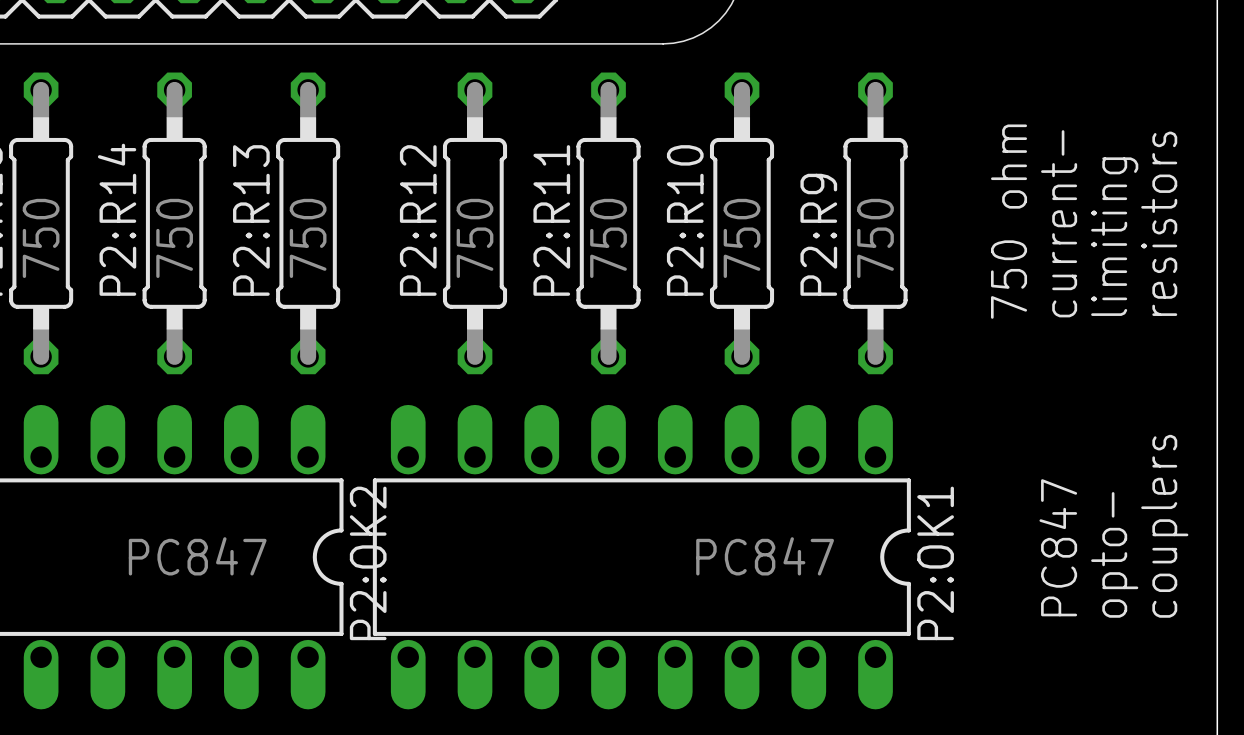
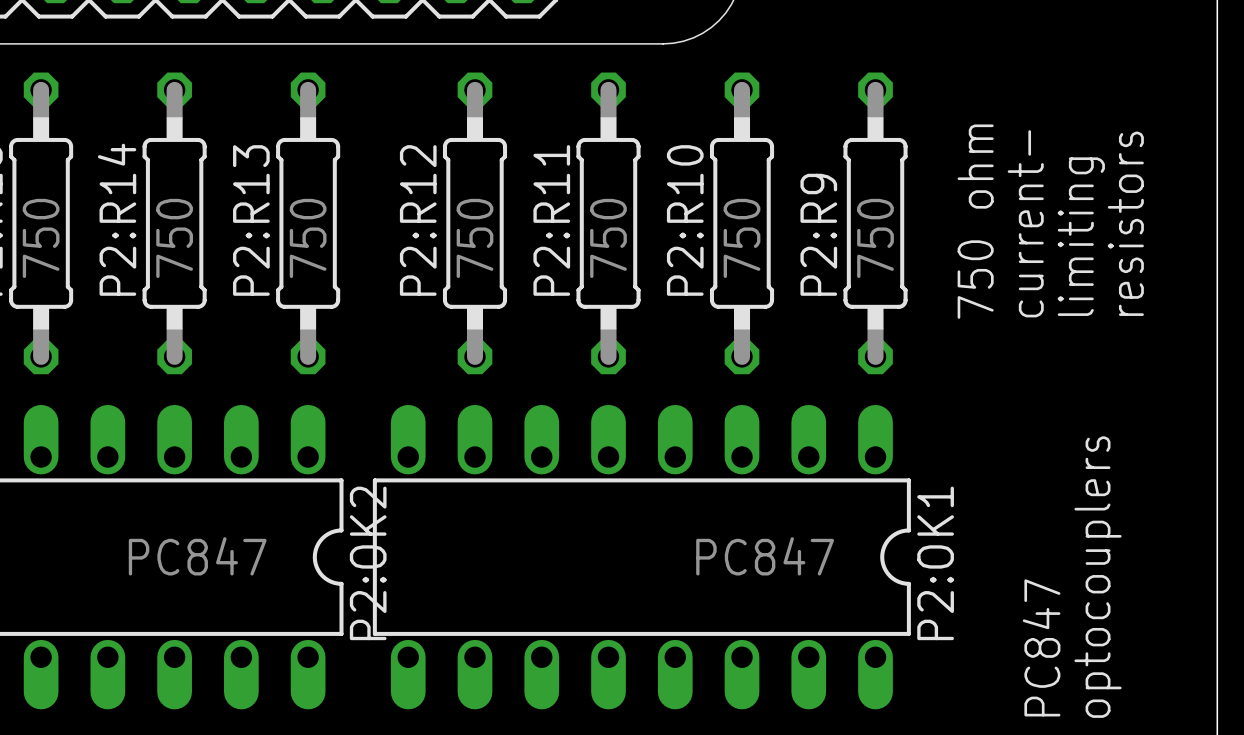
text position: 750 ohm (1009, 221) -> 750 ohm (975, 221)
text position: current- (1059, 223) -> current- (1025, 223)
text position: resistors (1159, 223) -> resistors (1125, 223)
text position: limiting (1114, 236) -> limiting (1081, 236)
text: couplers (1164, 526) -> optocouplers (1098, 577)
text position: PC847 (1058, 547) -> PC847 (1041, 647)
text: opto- (1114, 554) -> none

